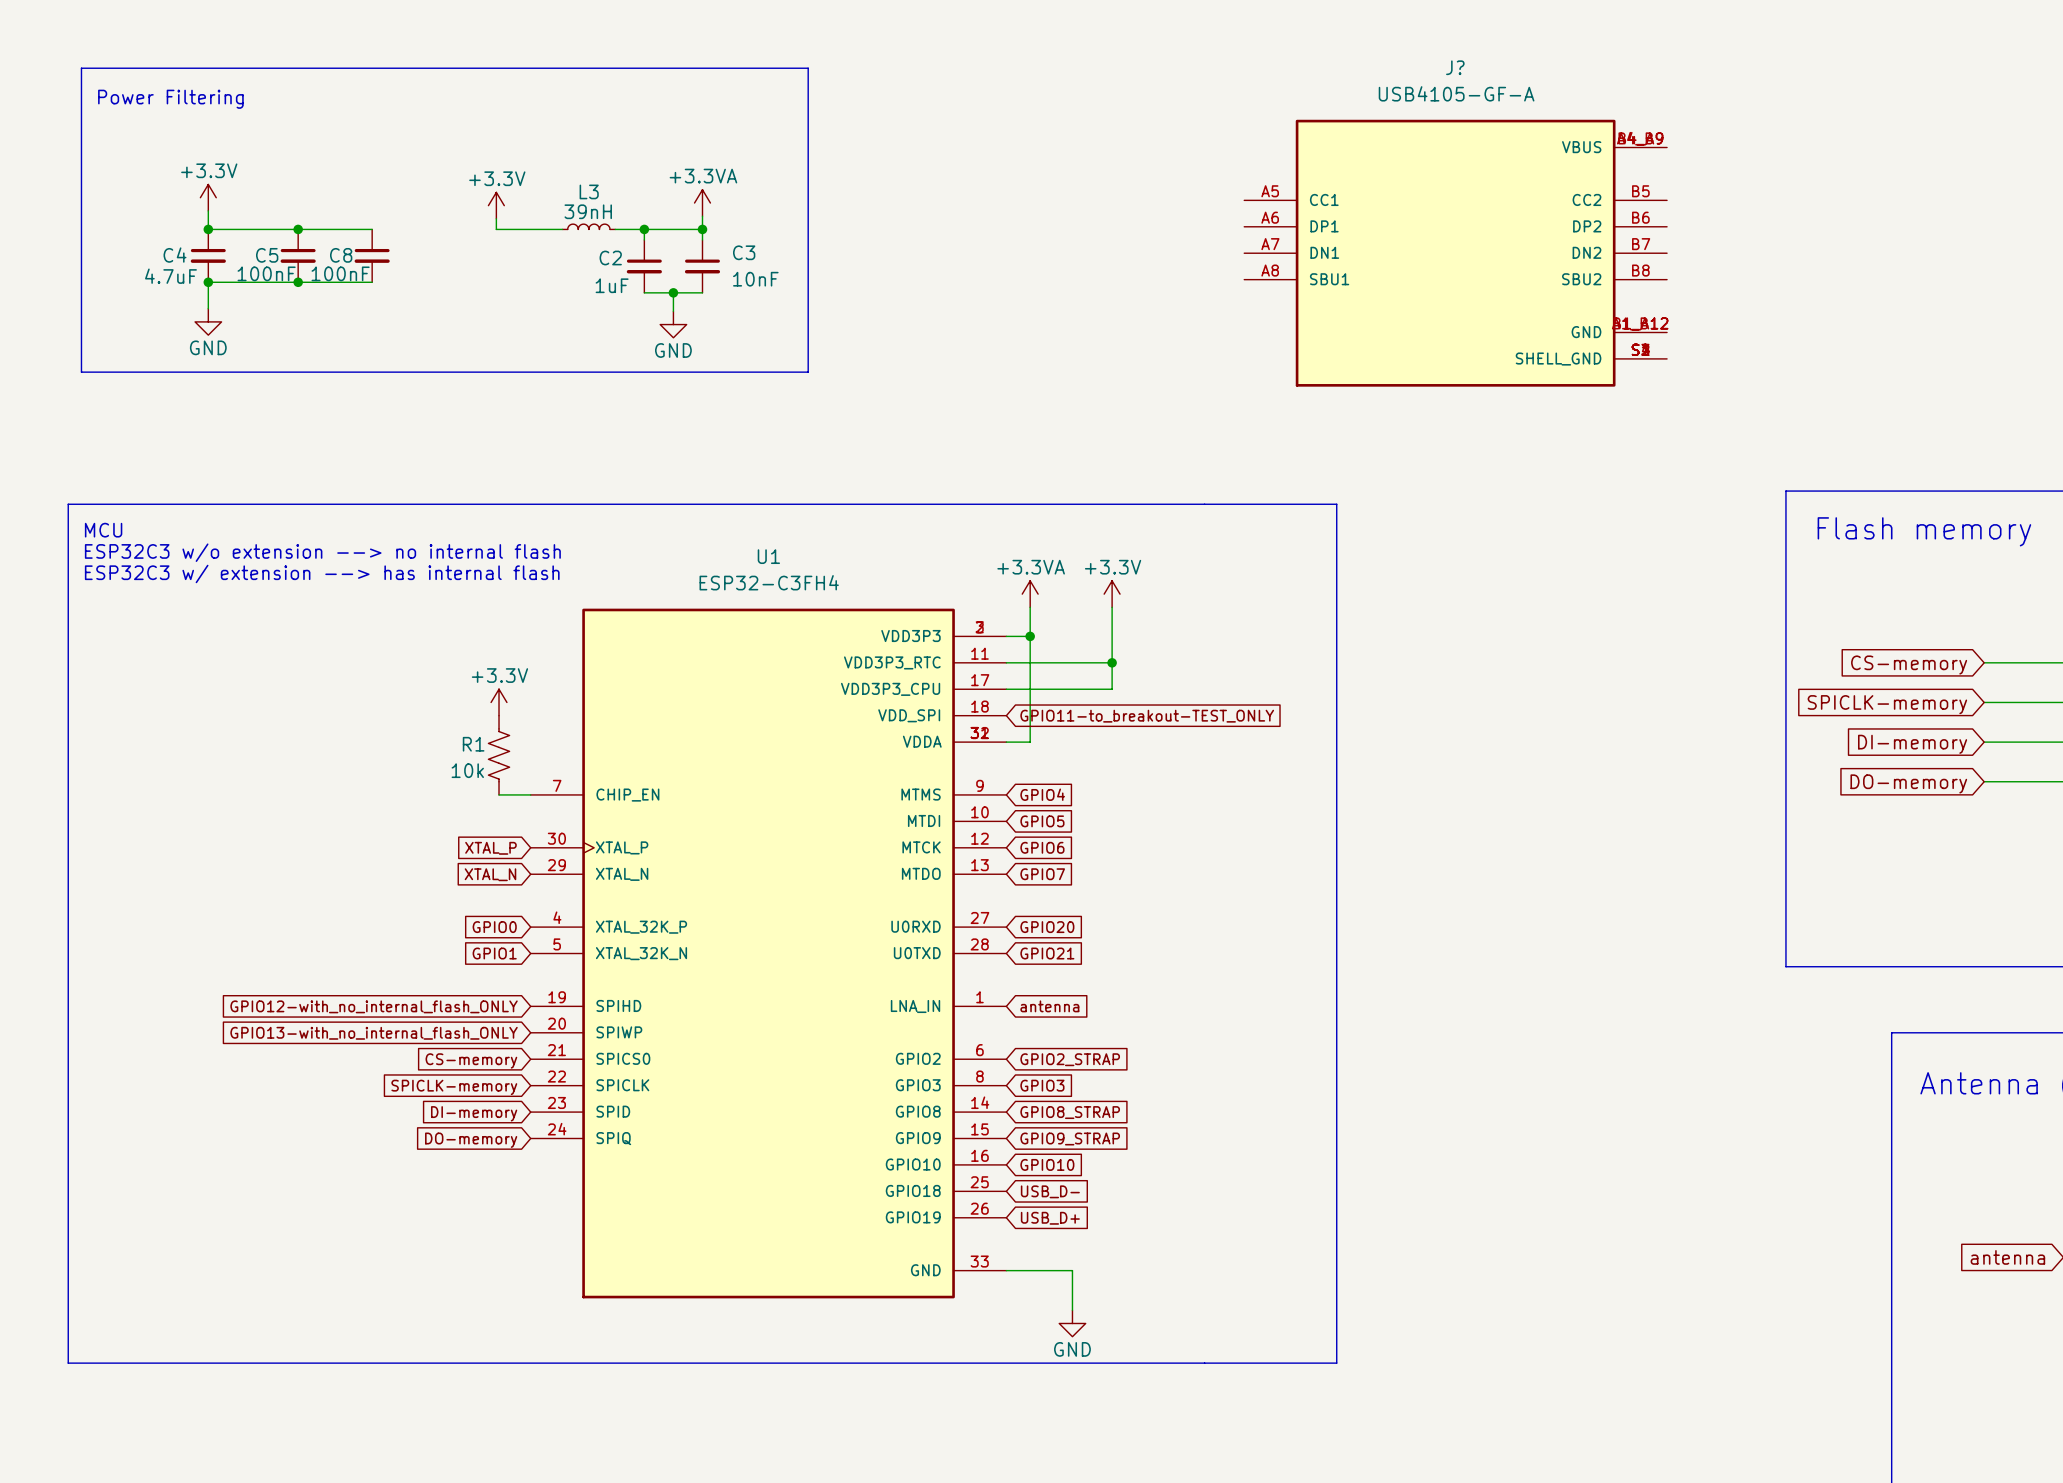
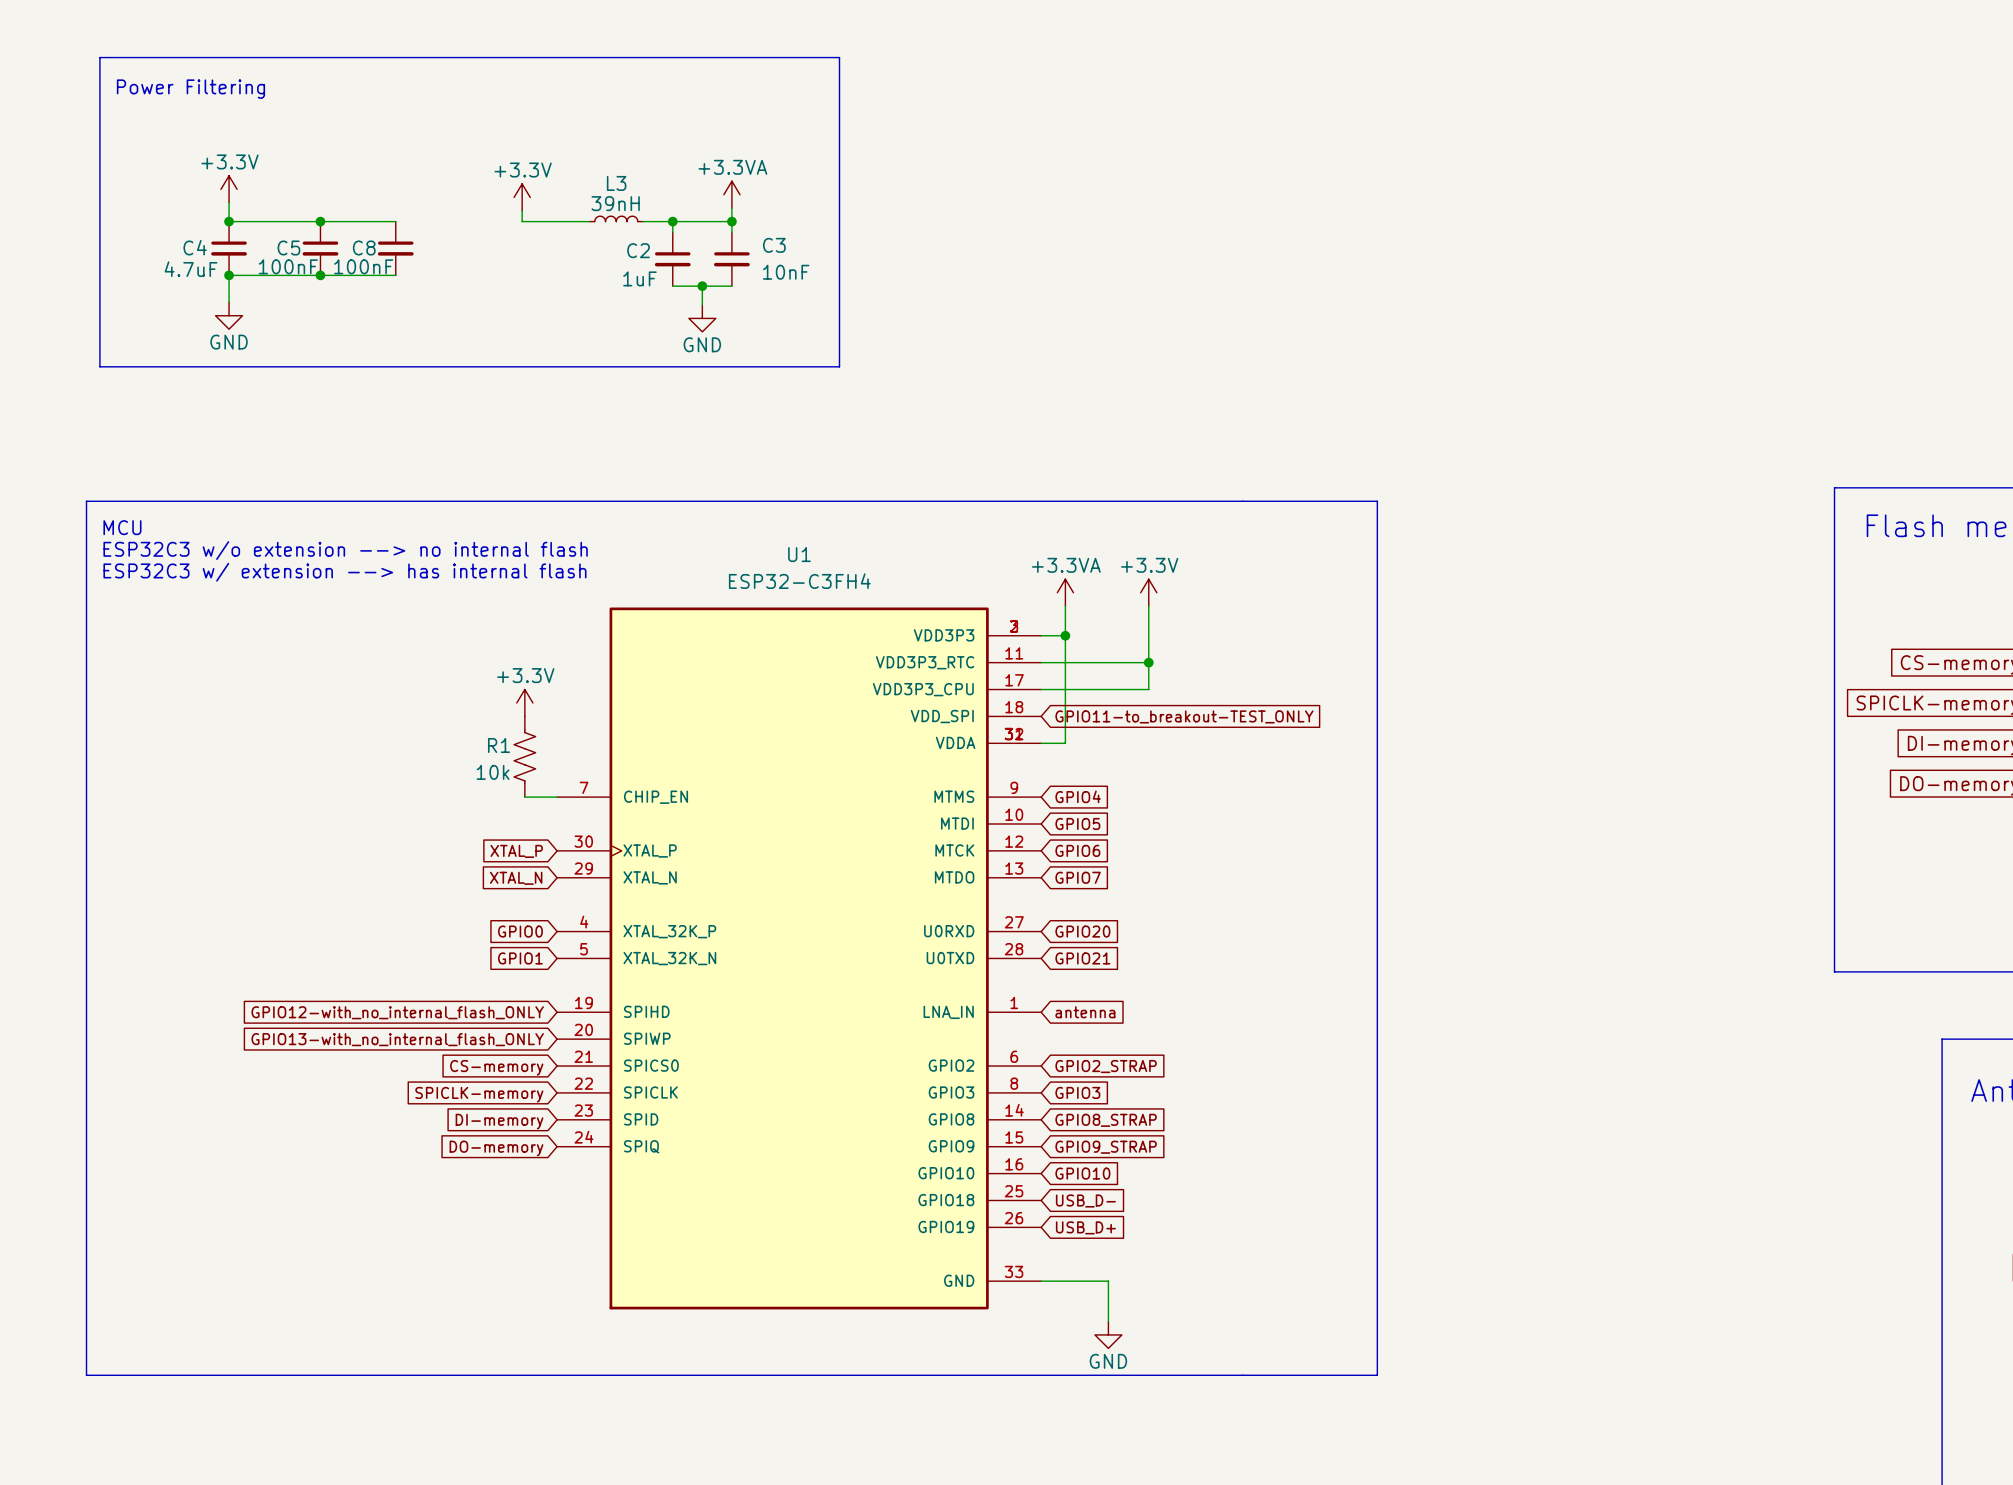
J?: USB4105-GF-A (1455, 253) -> none

